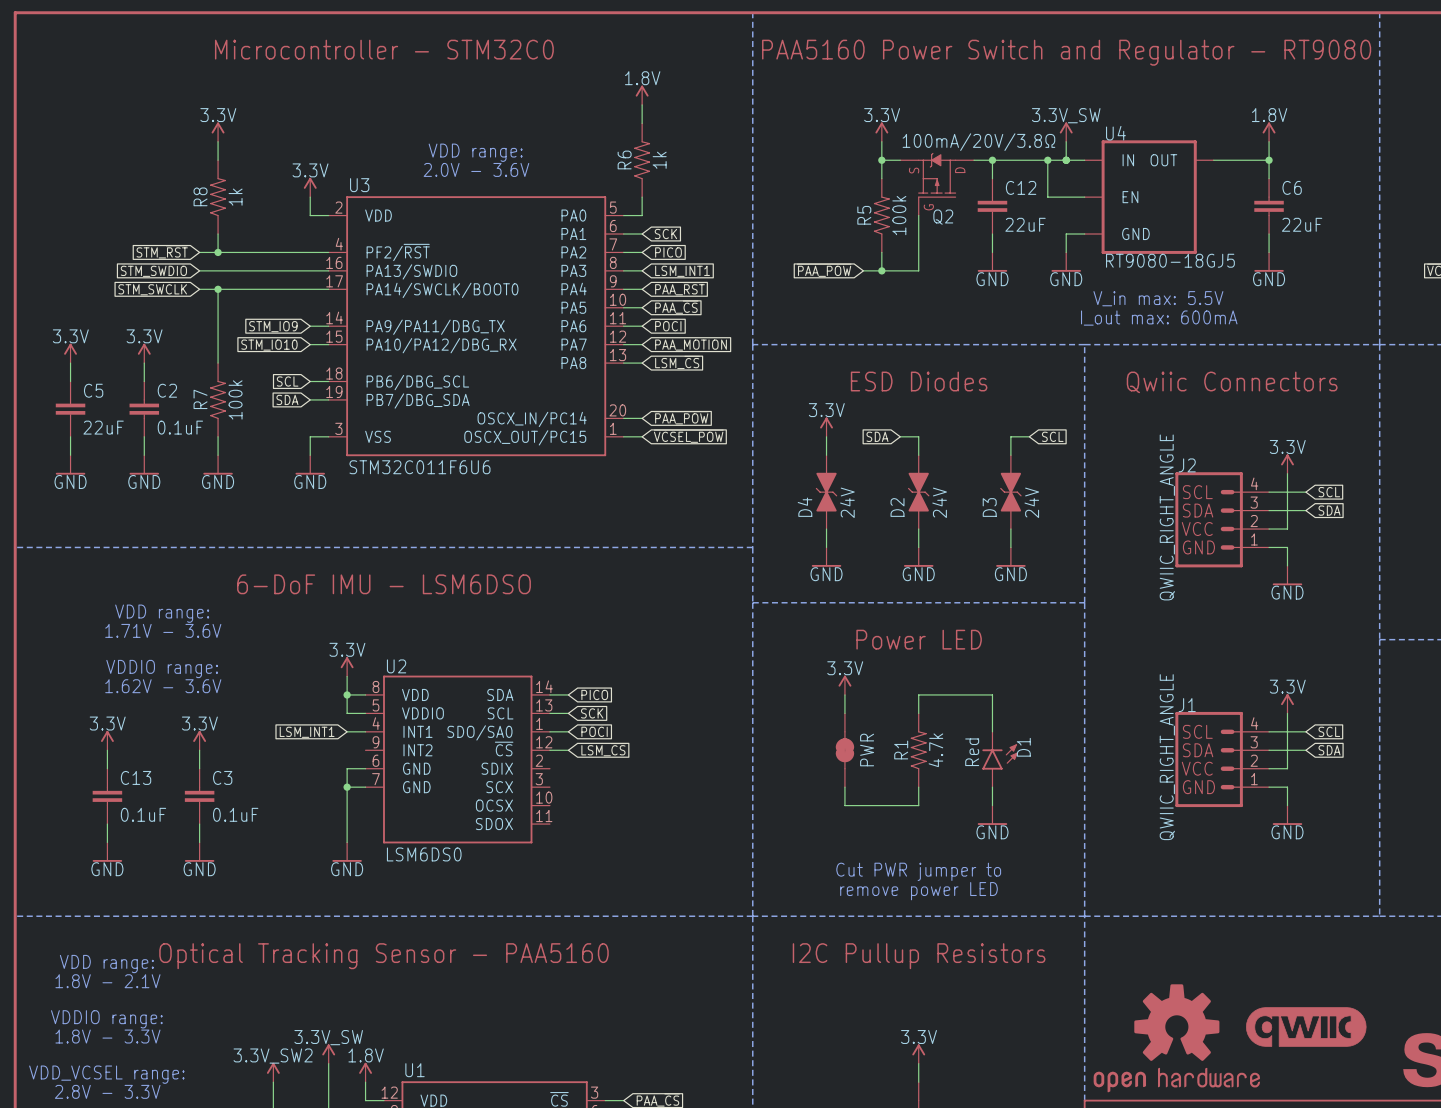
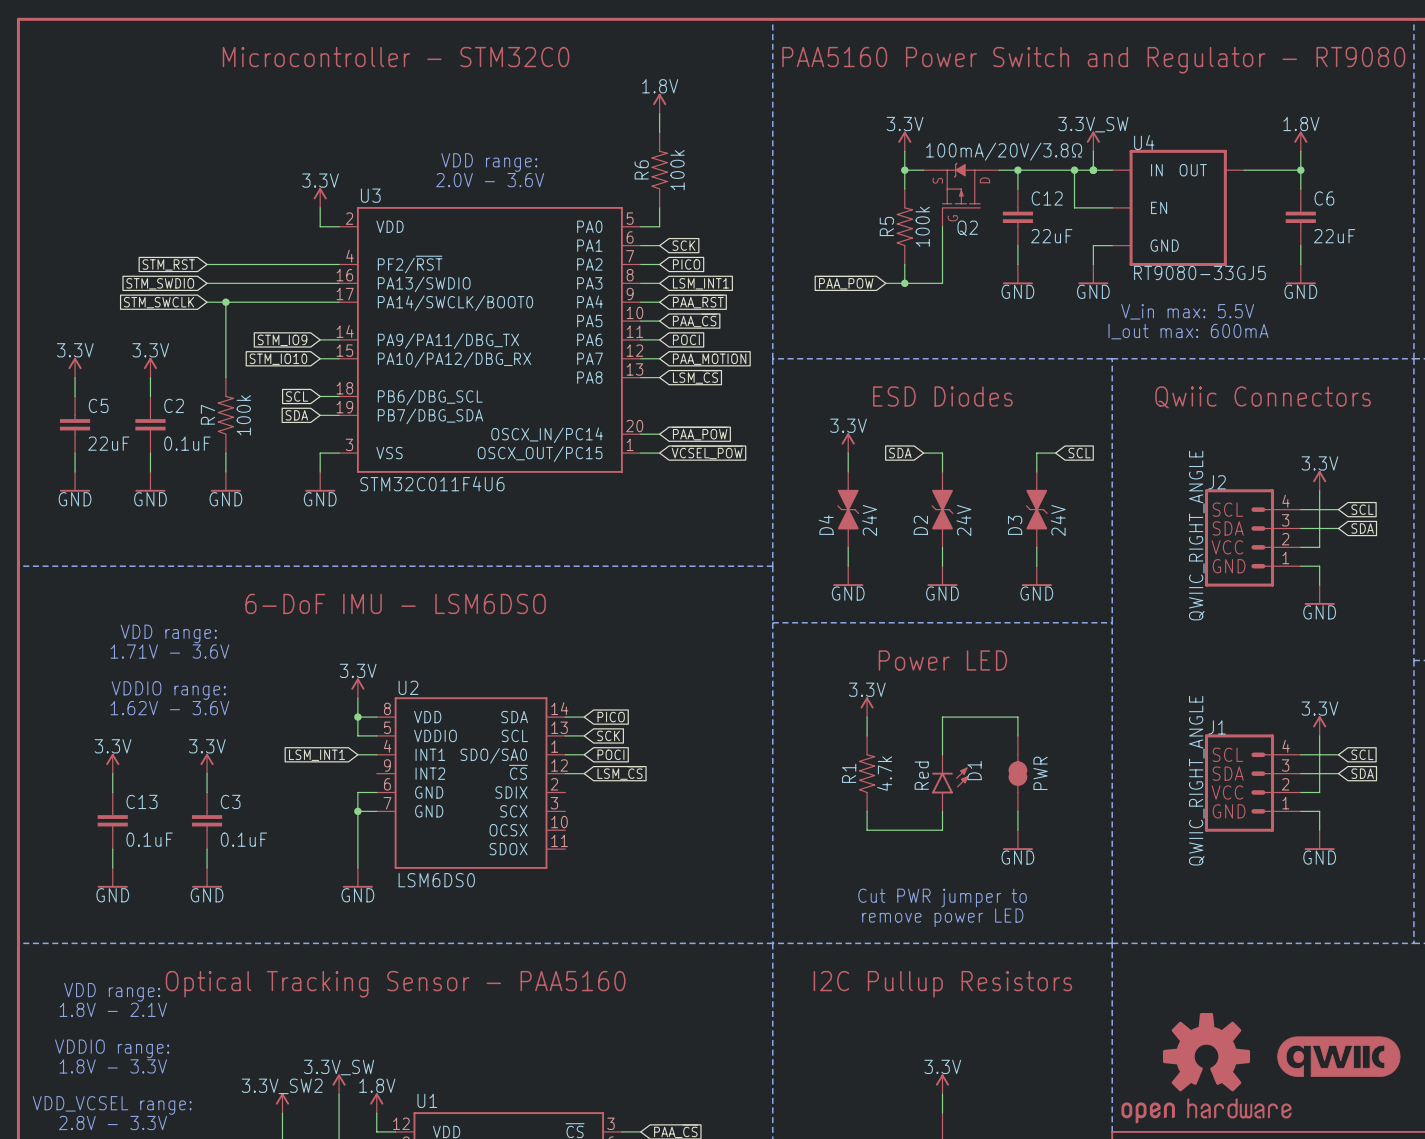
power symbol: 3.3V (218, 132) -> none
wire: (218, 141) (218, 160) -> none
R6 value: 1k (659, 160) -> 100k (677, 170)
R8: 1k (218, 197) -> none
wire: (218, 234) (218, 252) -> none
junction: (218, 252) -> none
U4 value: RT9080-18GJ5 (1170, 260) -> RT9080-33GJ5 (1199, 272)
U3 value: STM32C011F6U6 (419, 467) -> STM32C011F4U6 (432, 483)
PWR position: (844, 750) -> (1017, 773)
R1 position: (918, 750) -> (867, 773)
D1 position: (1000, 759) -> (950, 783)

